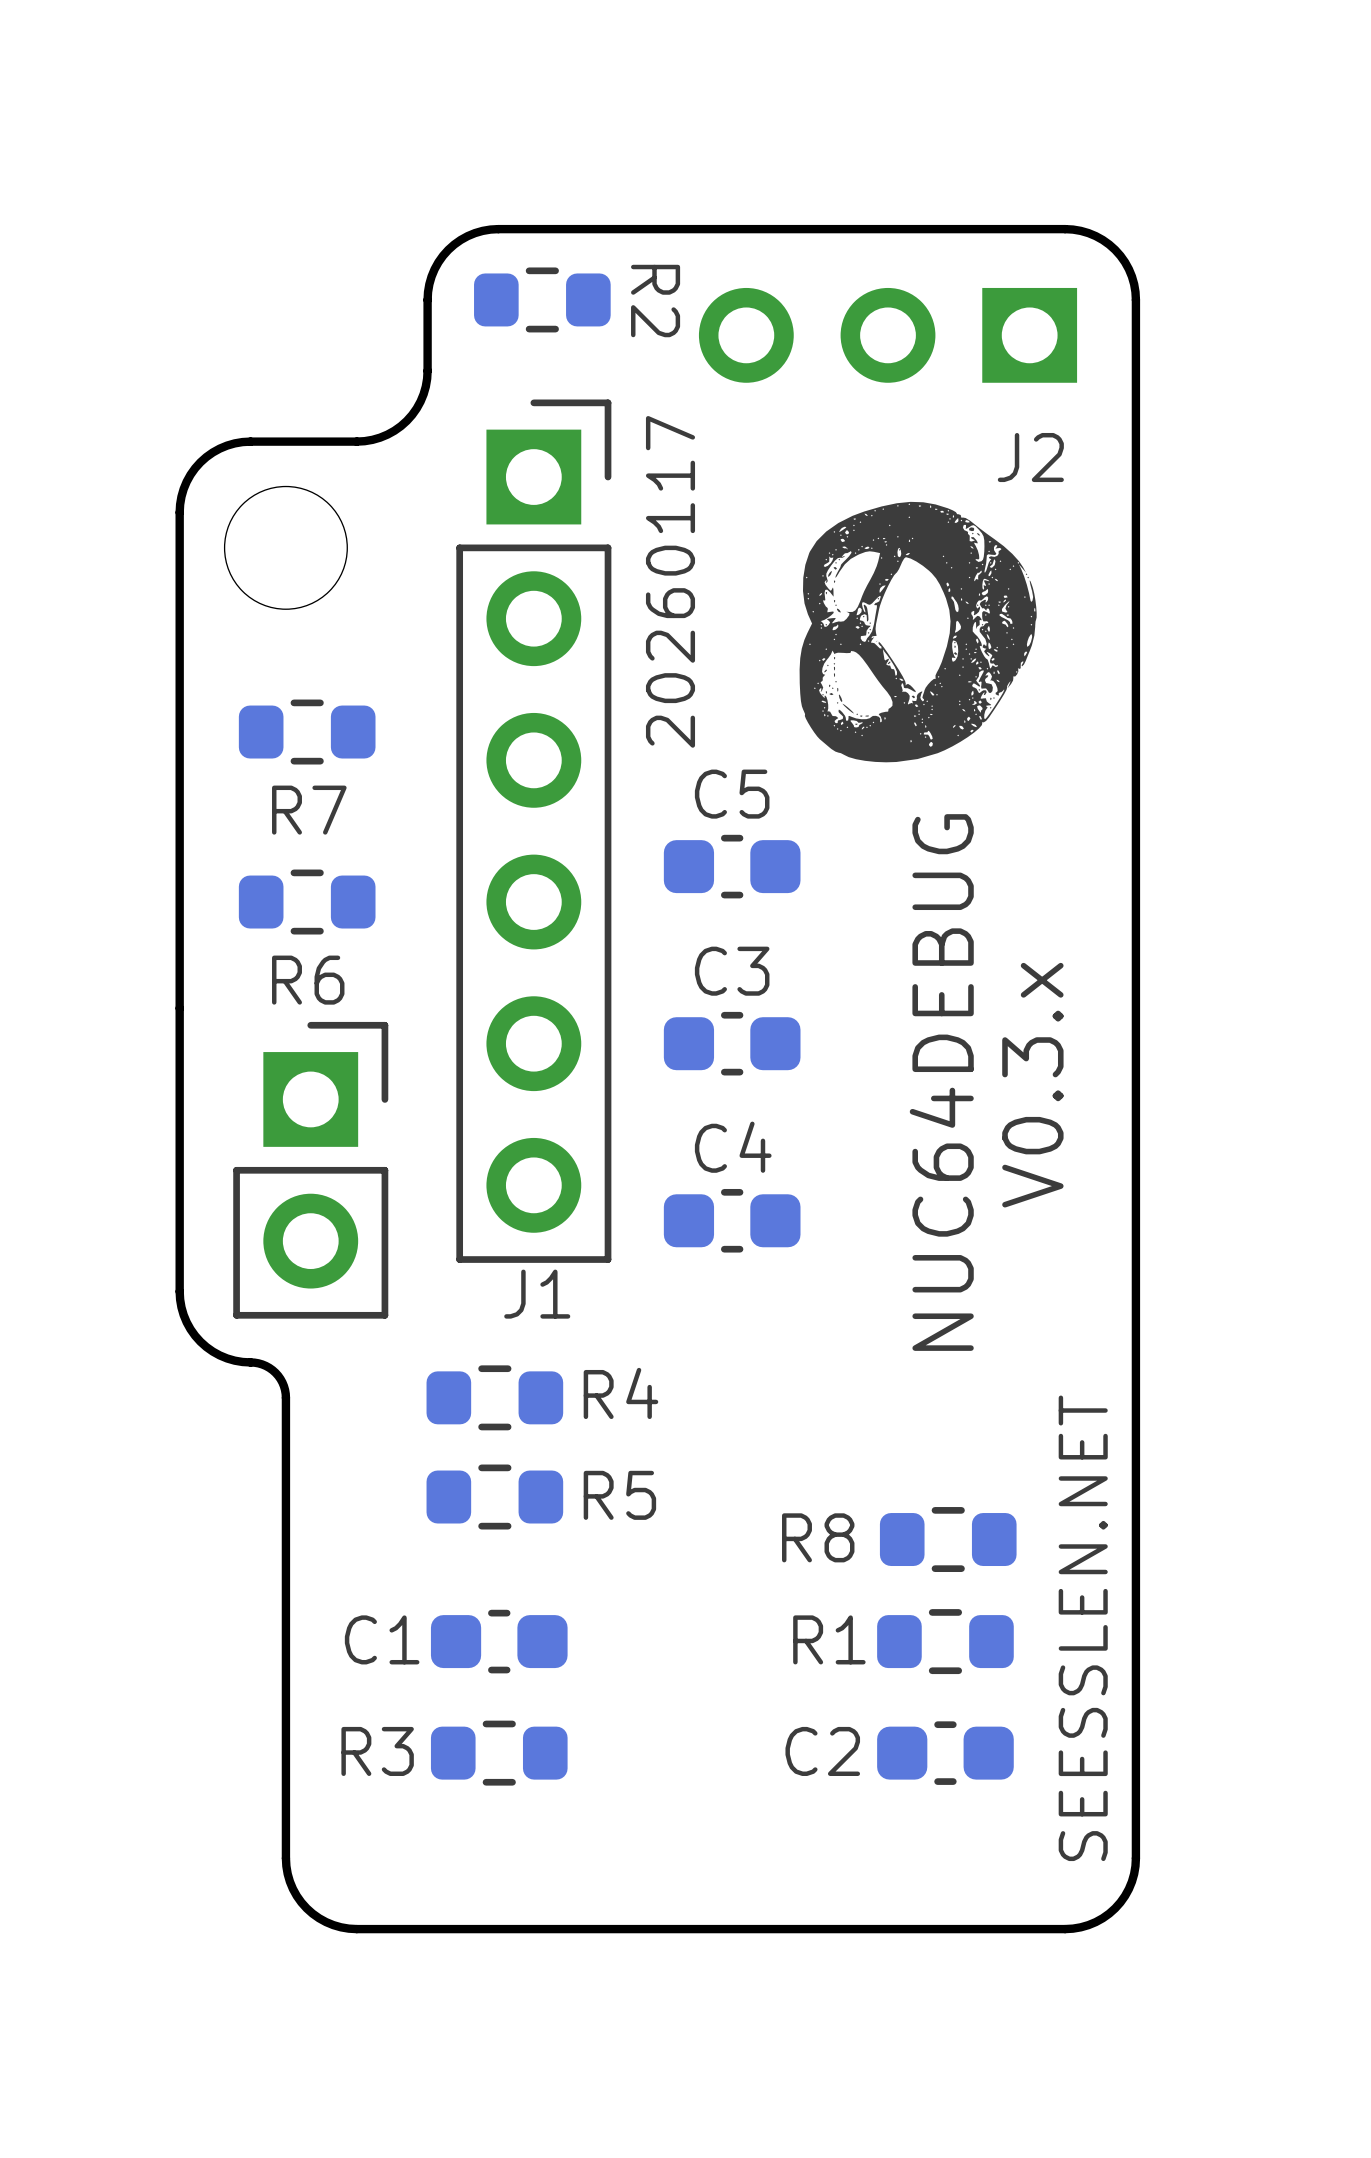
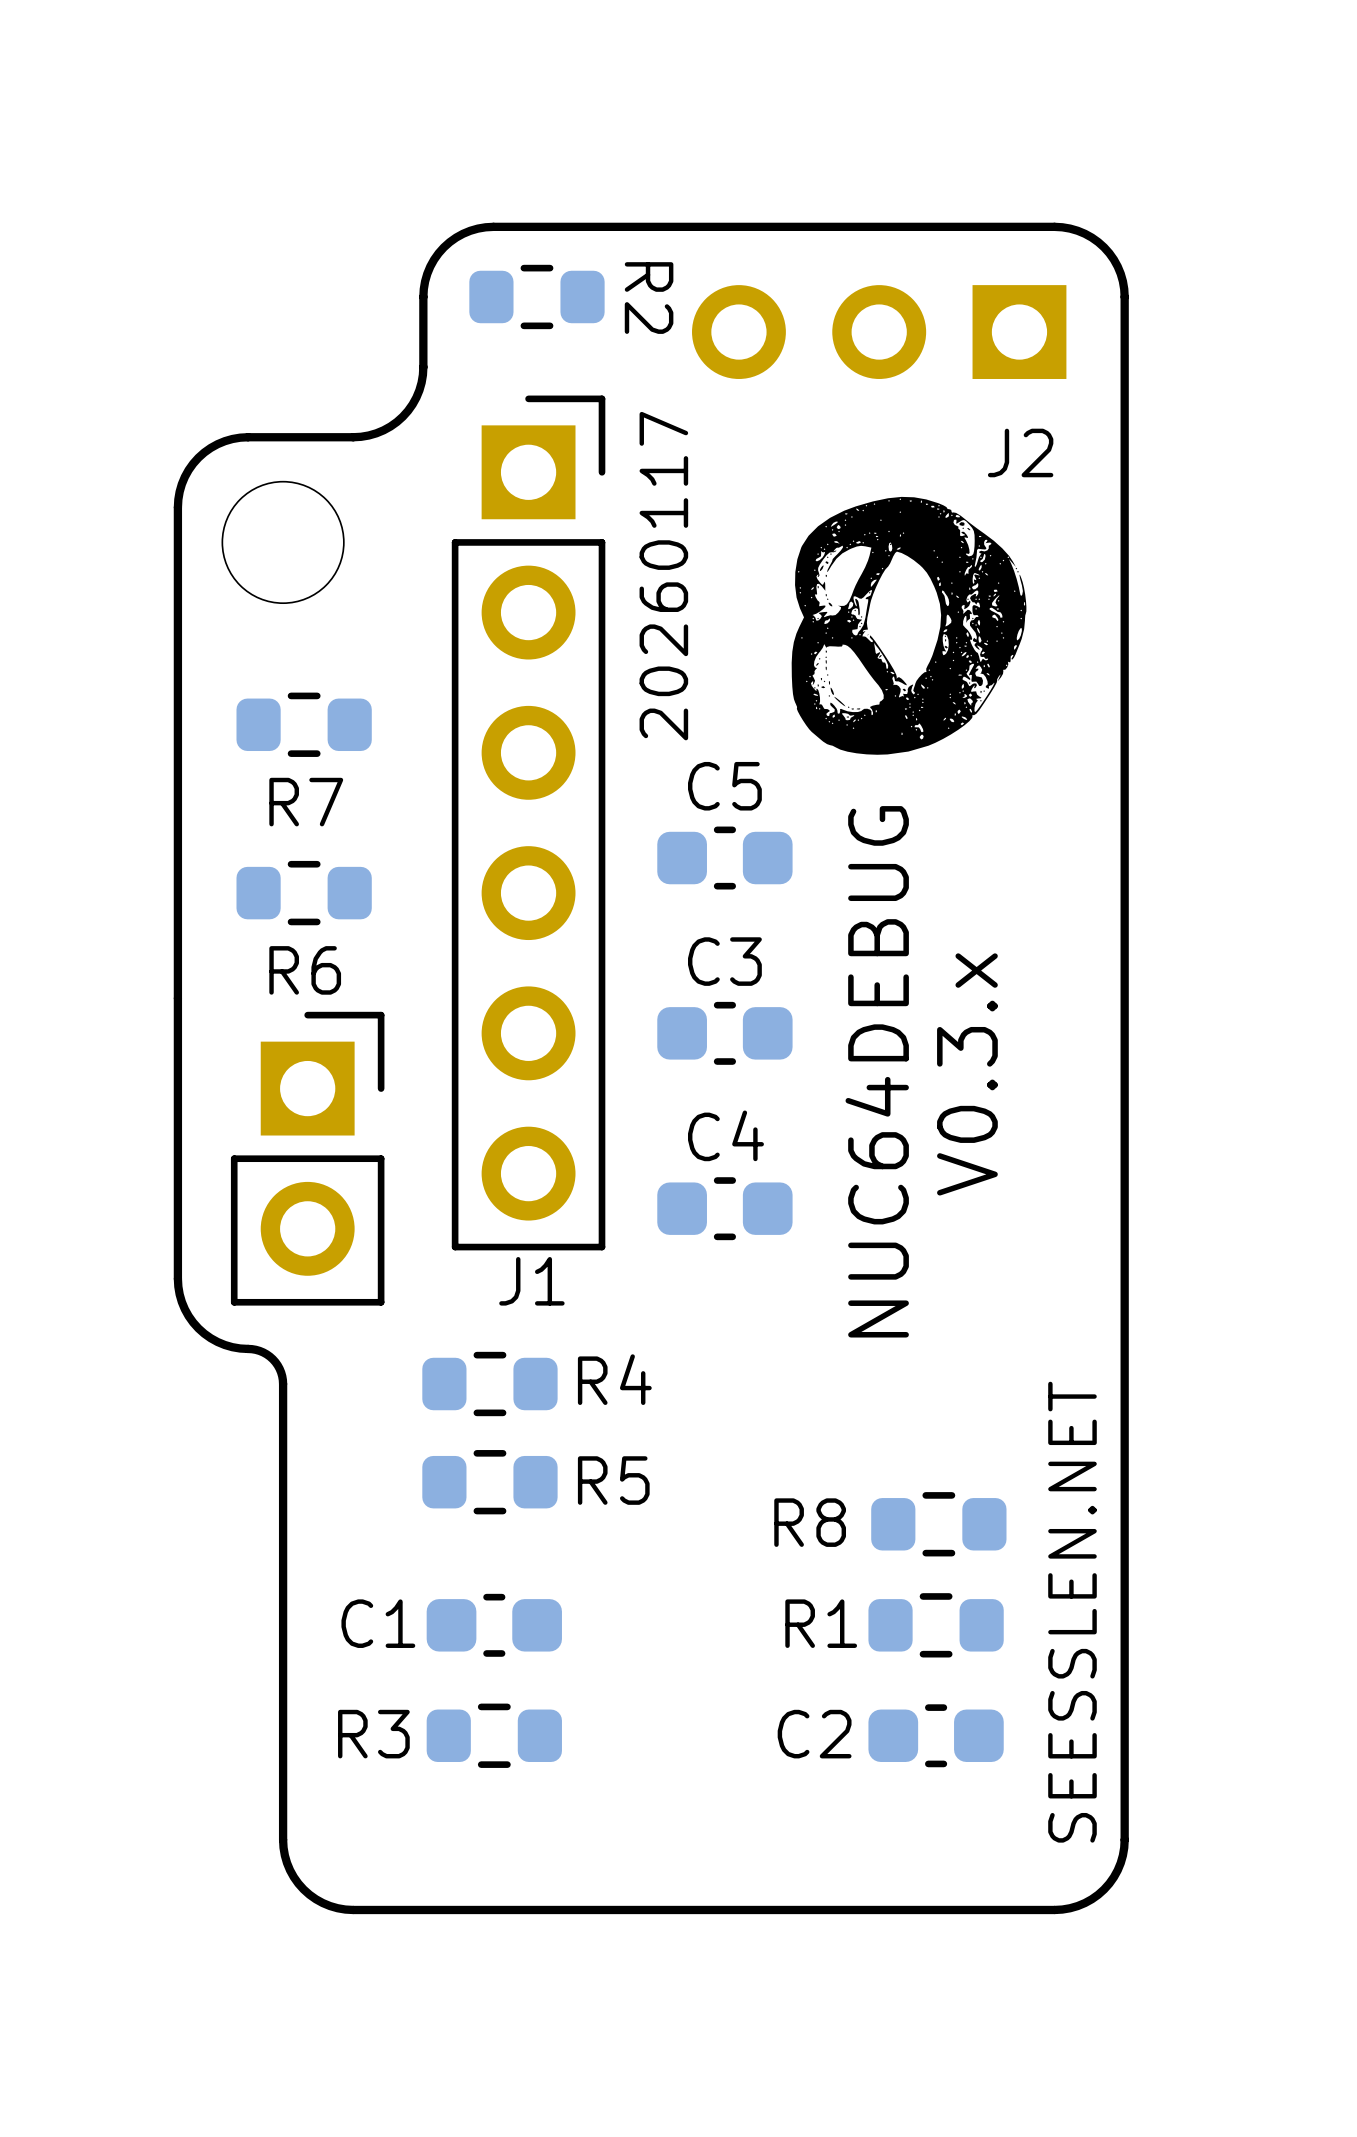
text position: NUC64DEBUG (941, 1082) -> NUC64DEBUG (877, 1071)
text position: V0.3.x (1032, 1085) -> V0.3.x (967, 1074)

